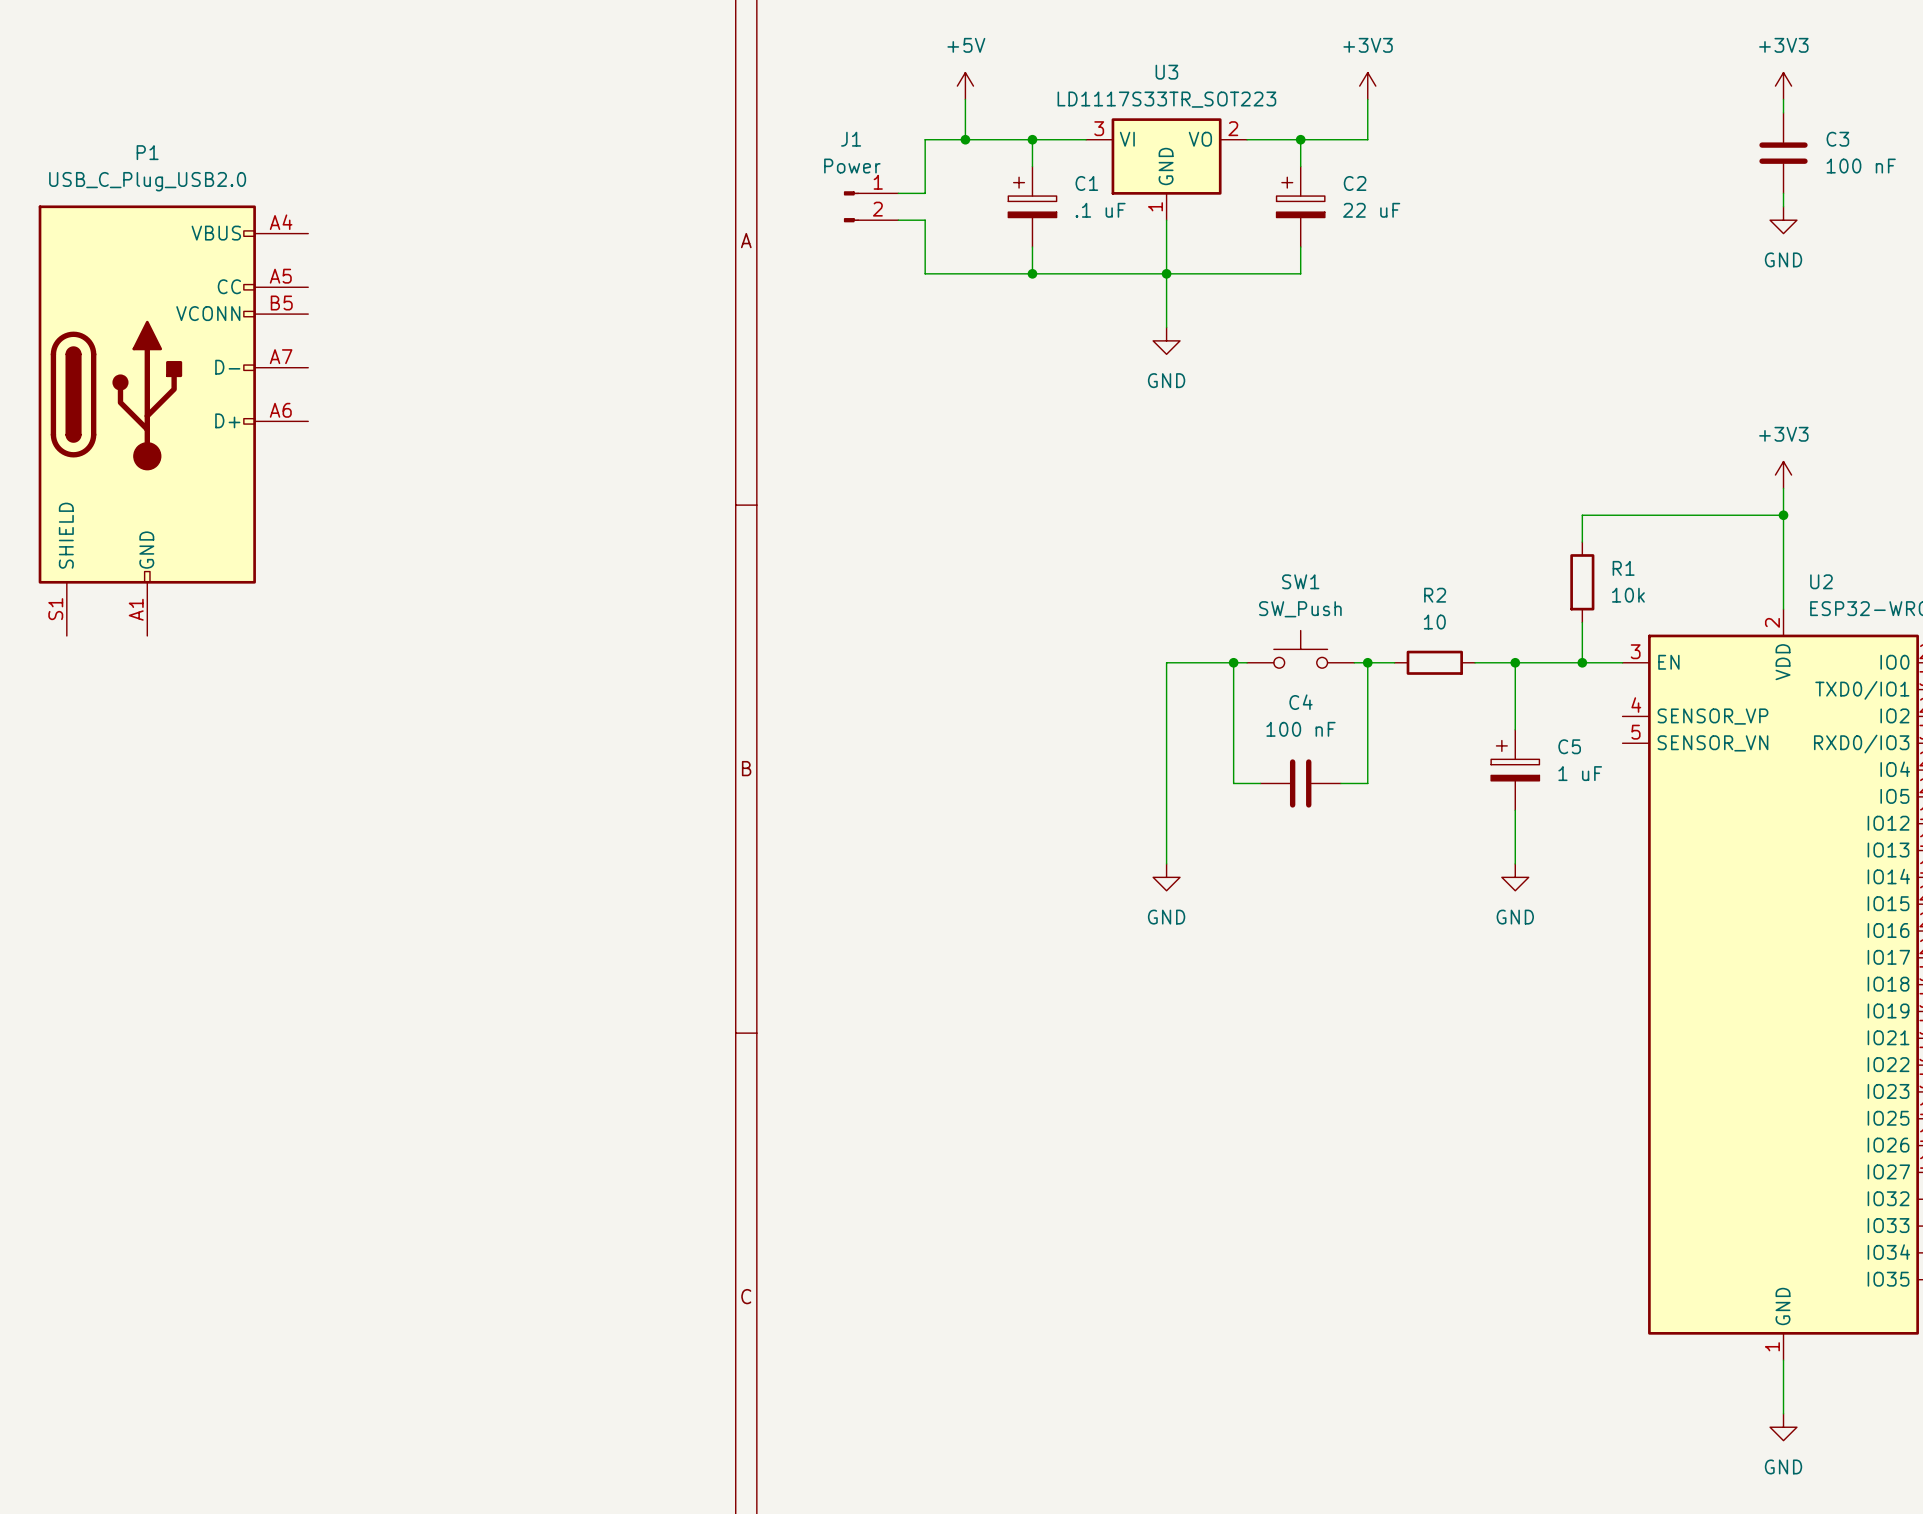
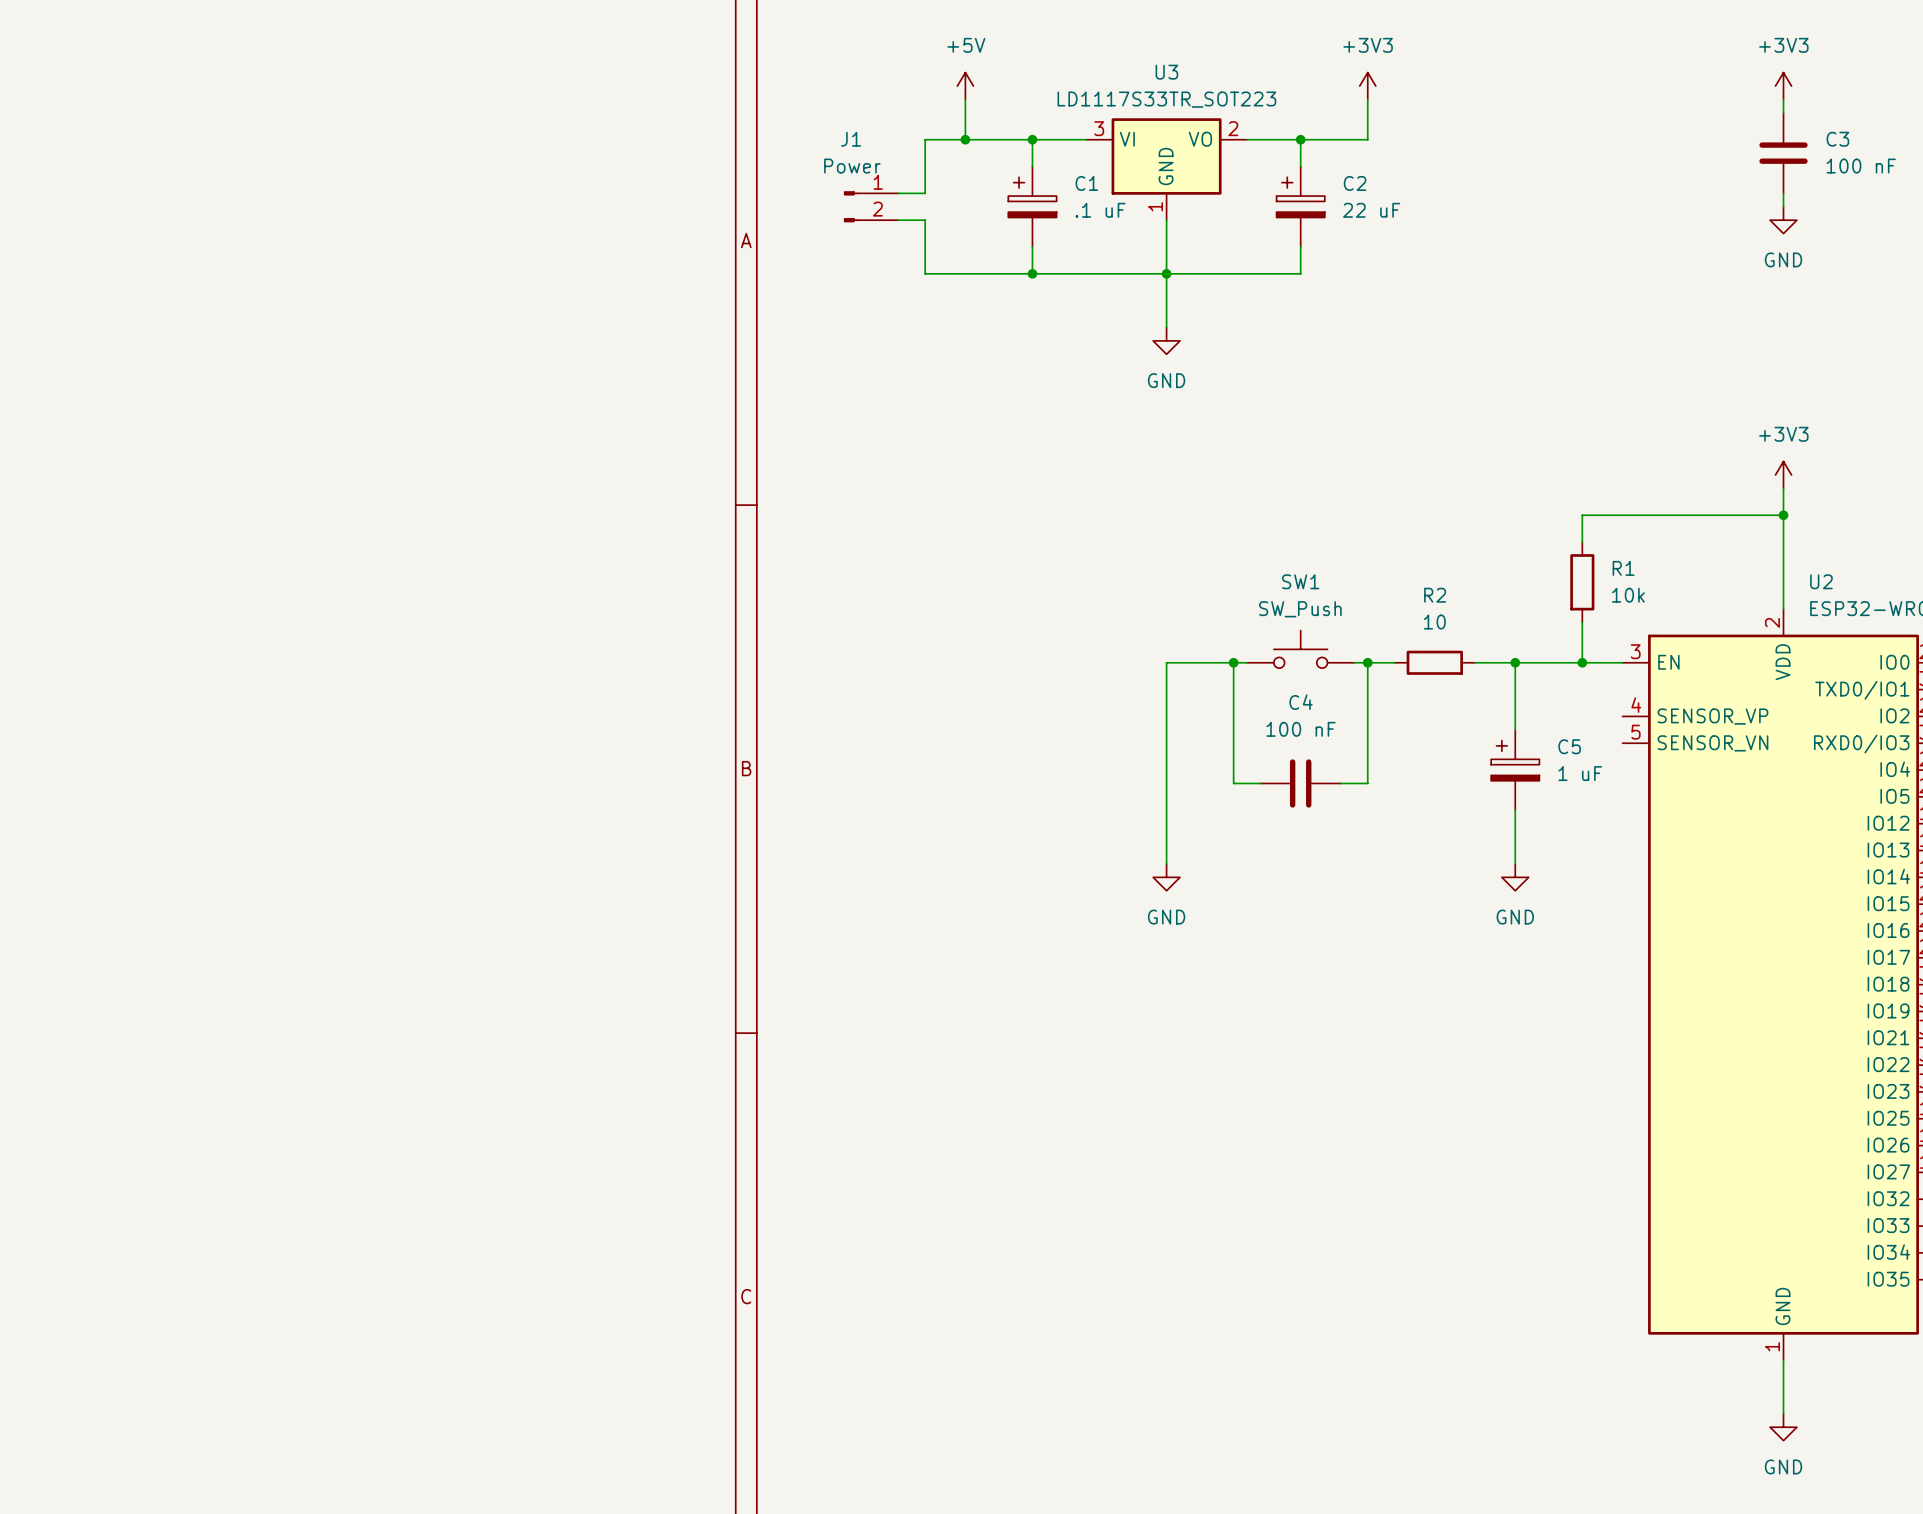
P1: USB_C_Plug_USB2.0 (173, 420) -> none

